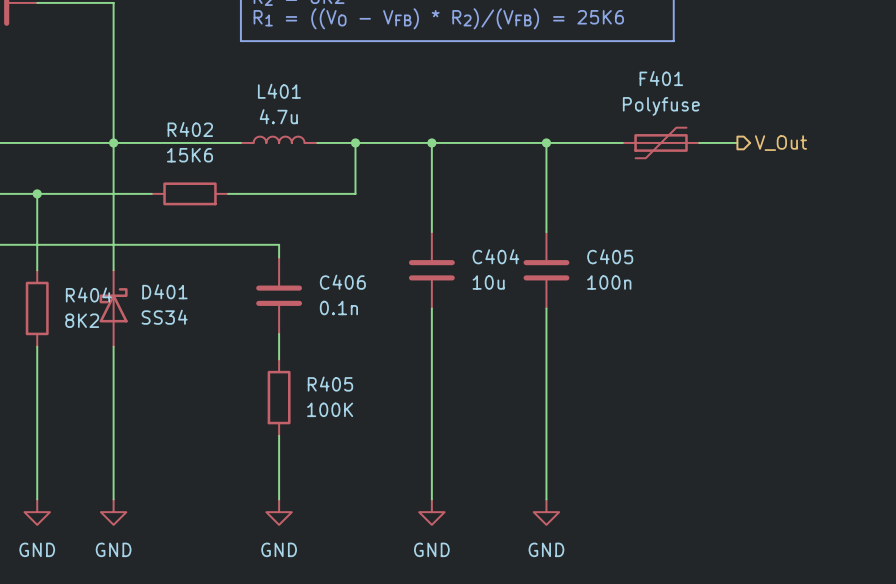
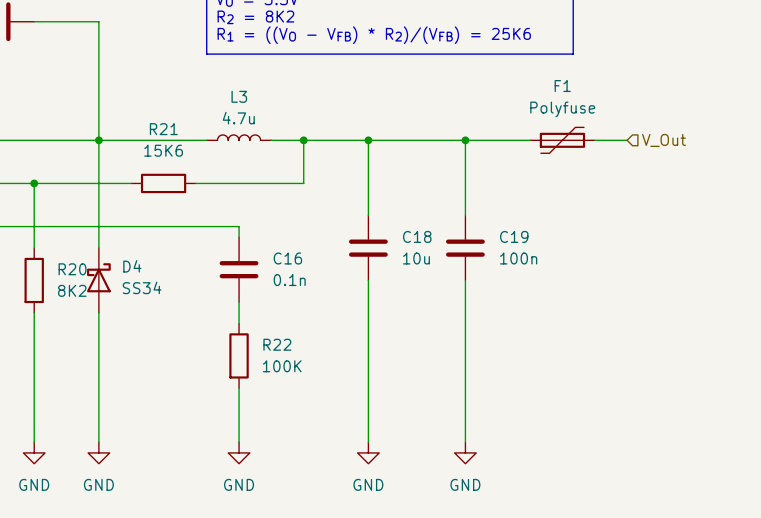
F401 name: F401 (661, 78) -> F1 (562, 86)
L401 name: L401 (279, 91) -> L3 (239, 96)
R402 name: R402 (190, 129) -> R21 (163, 129)
hierarchical label shape: output (780, 143) -> input (663, 140)
C404 name: C404 (495, 256) -> C18 (417, 236)
C405 name: C405 (610, 256) -> C19 (514, 236)
C406 name: C406 (342, 282) -> C16 (287, 258)
D401 name: D401 (164, 291) -> D4 (132, 266)
R404 name: R404 (88, 294) -> R20 (72, 269)
R405 name: R405 (330, 384) -> R22 (277, 344)

